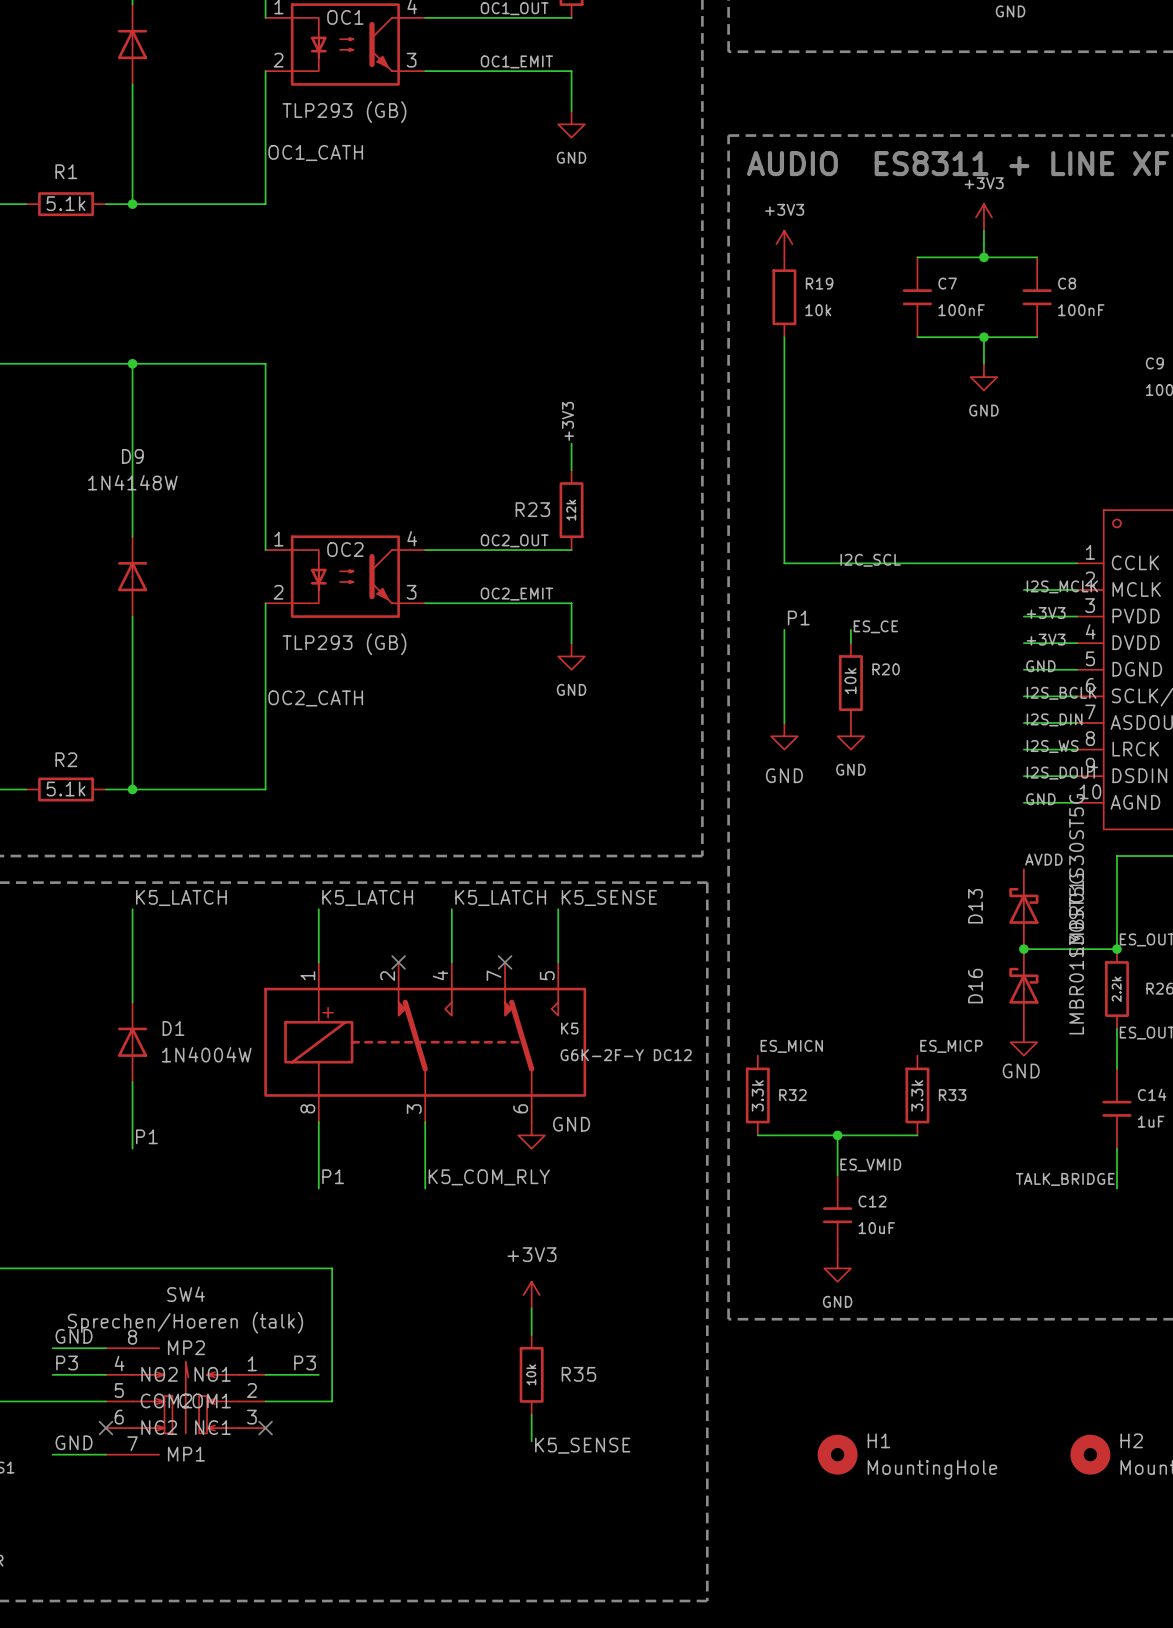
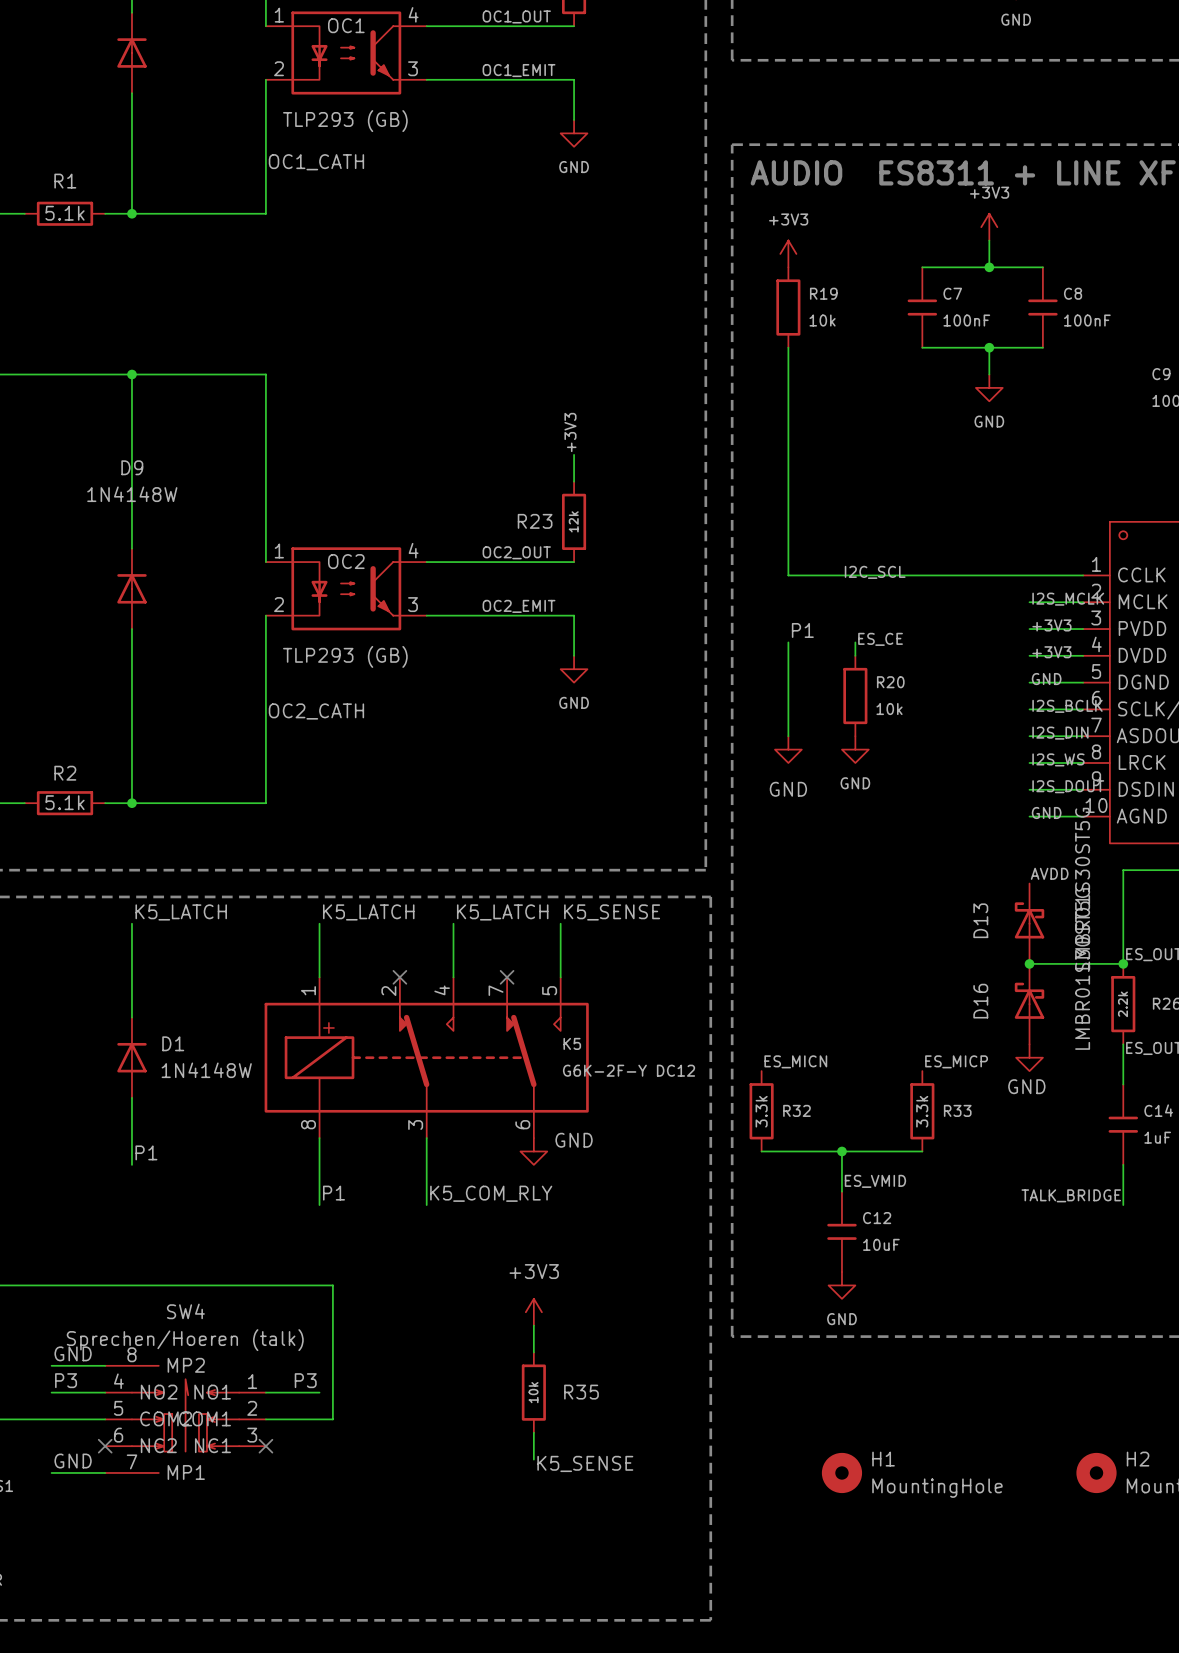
R20 value rotation: 0° (850, 681) -> 90° clockwise (889, 709)
R20 value position: 10k (850, 681) -> 10k (889, 709)
D1 value: 1N4004W (206, 1054) -> 1N4148W (206, 1070)

